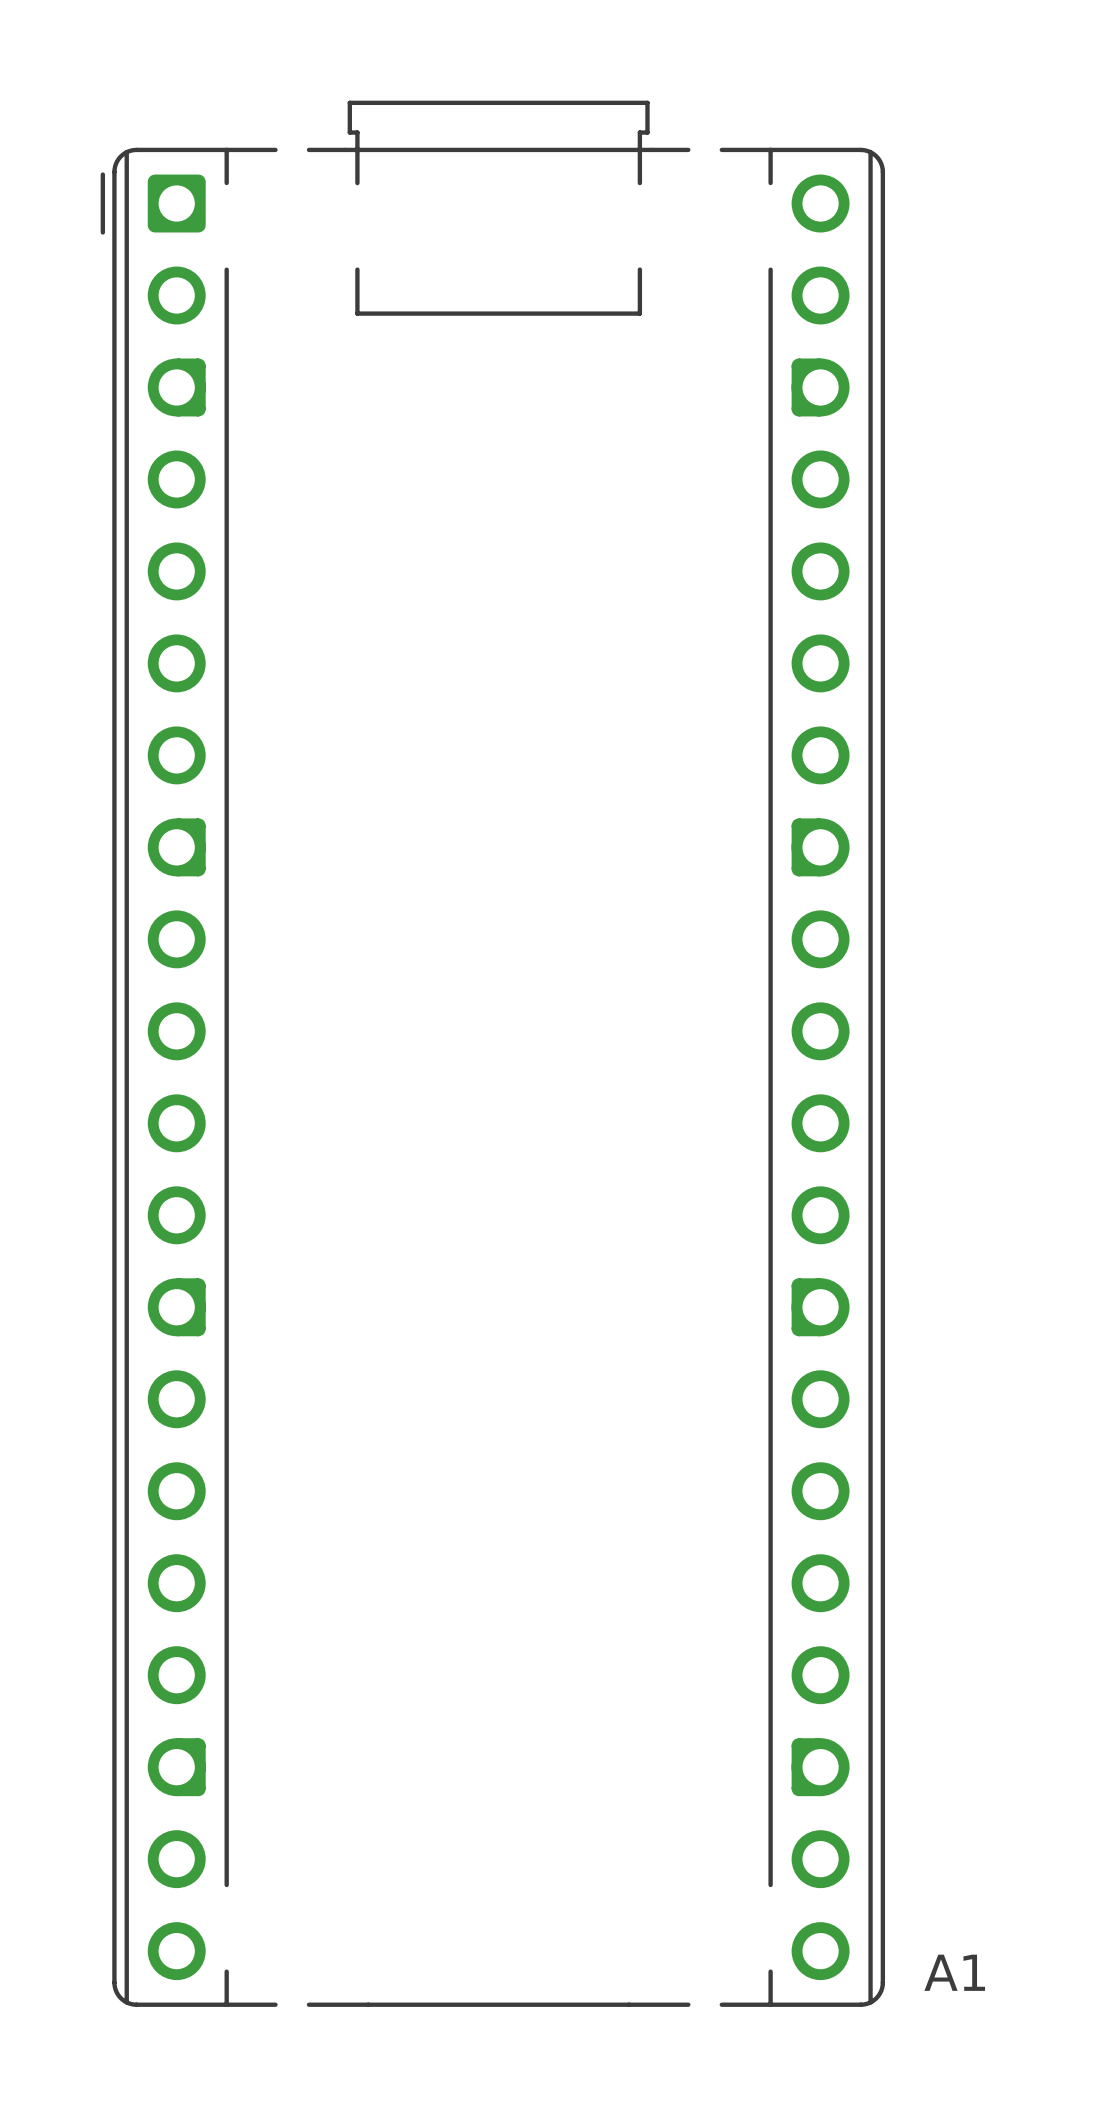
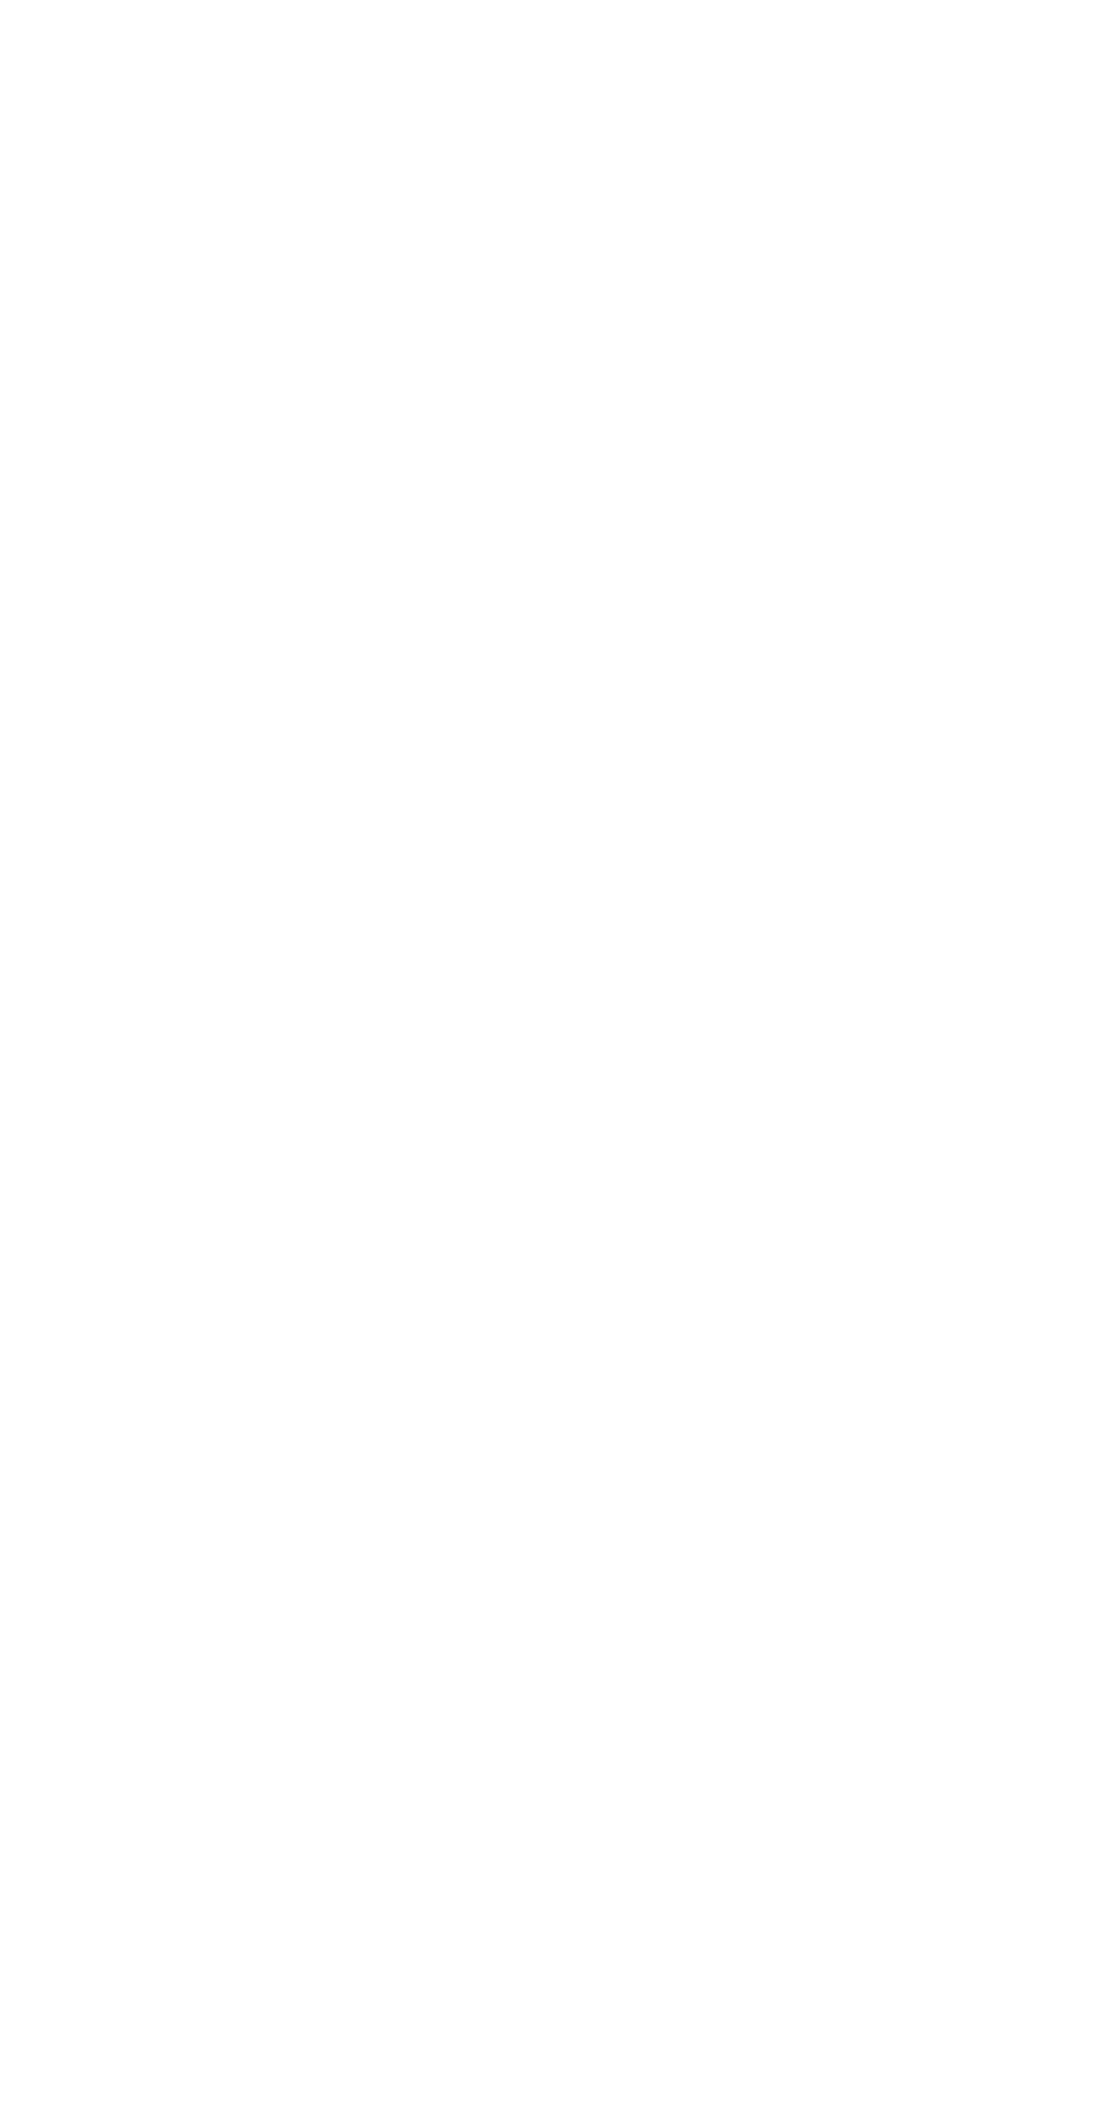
A1: (492, 1053) -> none

